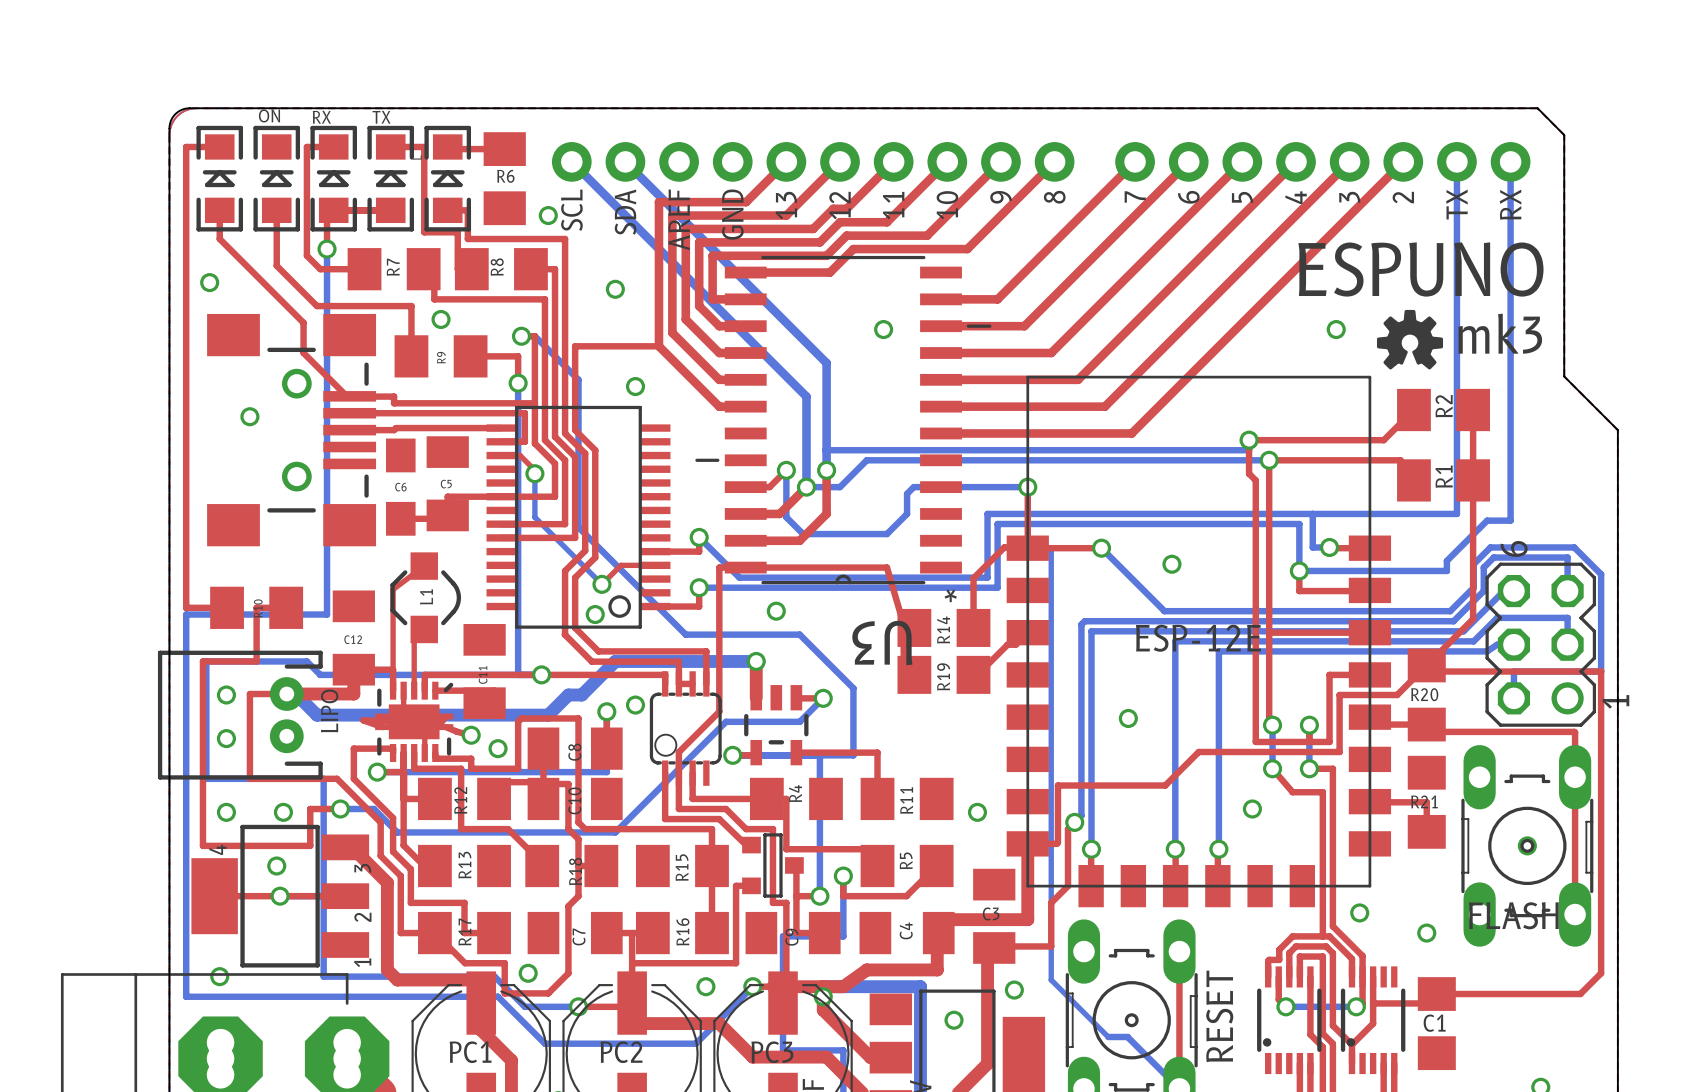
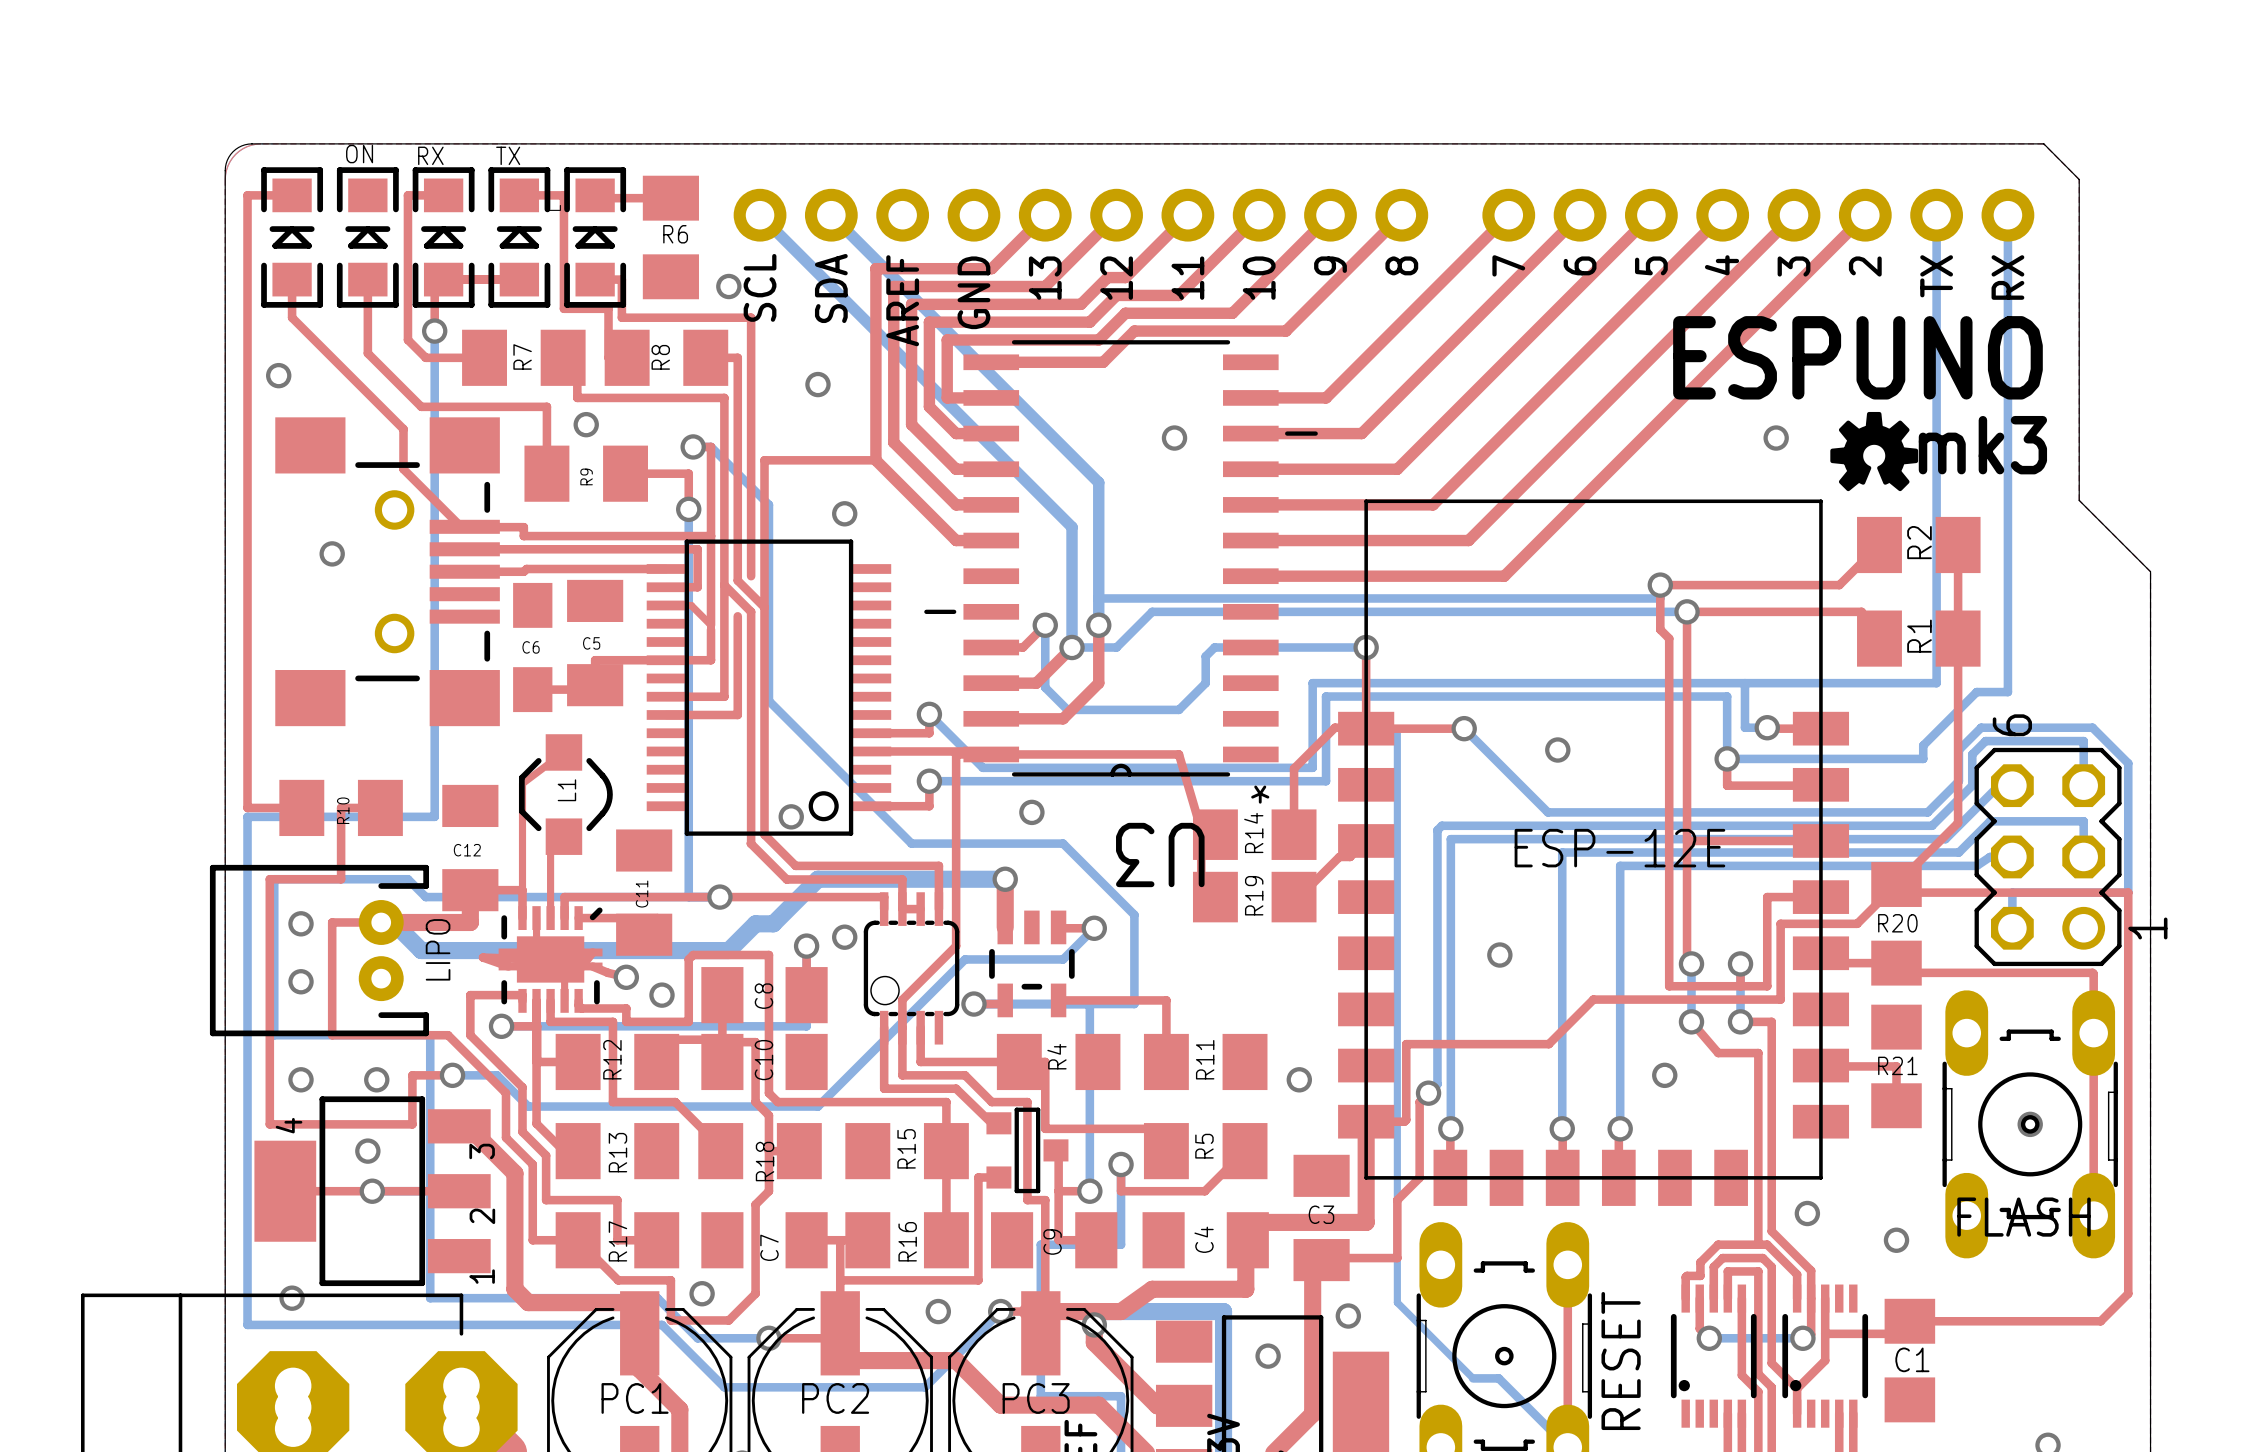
top track: (575, 430) (595, 450) (595, 557) (575, 577) -> (764, 571) (764, 607)
top track: (565, 433) (585, 453) (585, 550) (565, 570) -> none
top track: none -> (724, 585) (724, 696)
top track: (534, 443) (555, 463) -> (711, 589) (711, 625)
bottom track: (534, 473) (534, 517) (601, 584) -> none
via: (534, 473) -> none
top track: (534, 496) (555, 496) -> (711, 660) (711, 629)
top track: none -> (737, 660) (737, 714)
top track: (544, 524) (565, 524) -> (751, 758) (751, 696)
top track: (555, 537) (575, 537) -> (764, 767) (764, 714)
top track: (655, 565) (620, 565) (601, 584) -> (871, 751) (991, 751)
via: (601, 584) -> none

